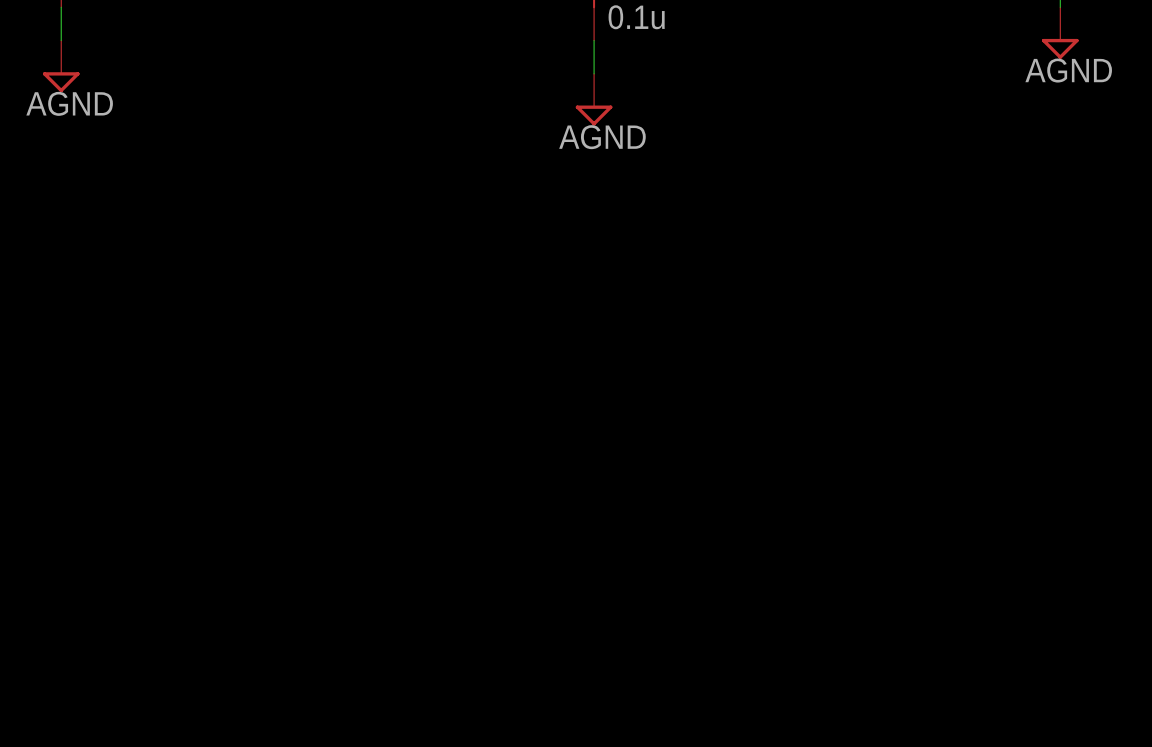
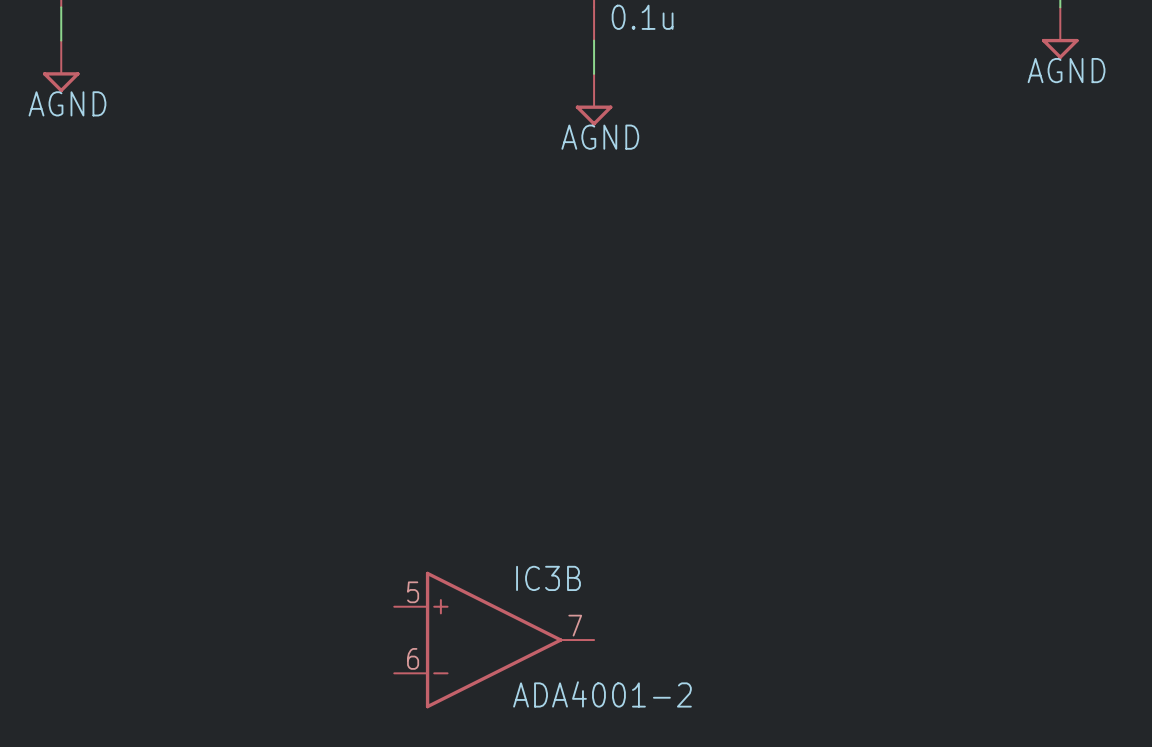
IC3B: none -> ADA4001-2 (494, 640)

